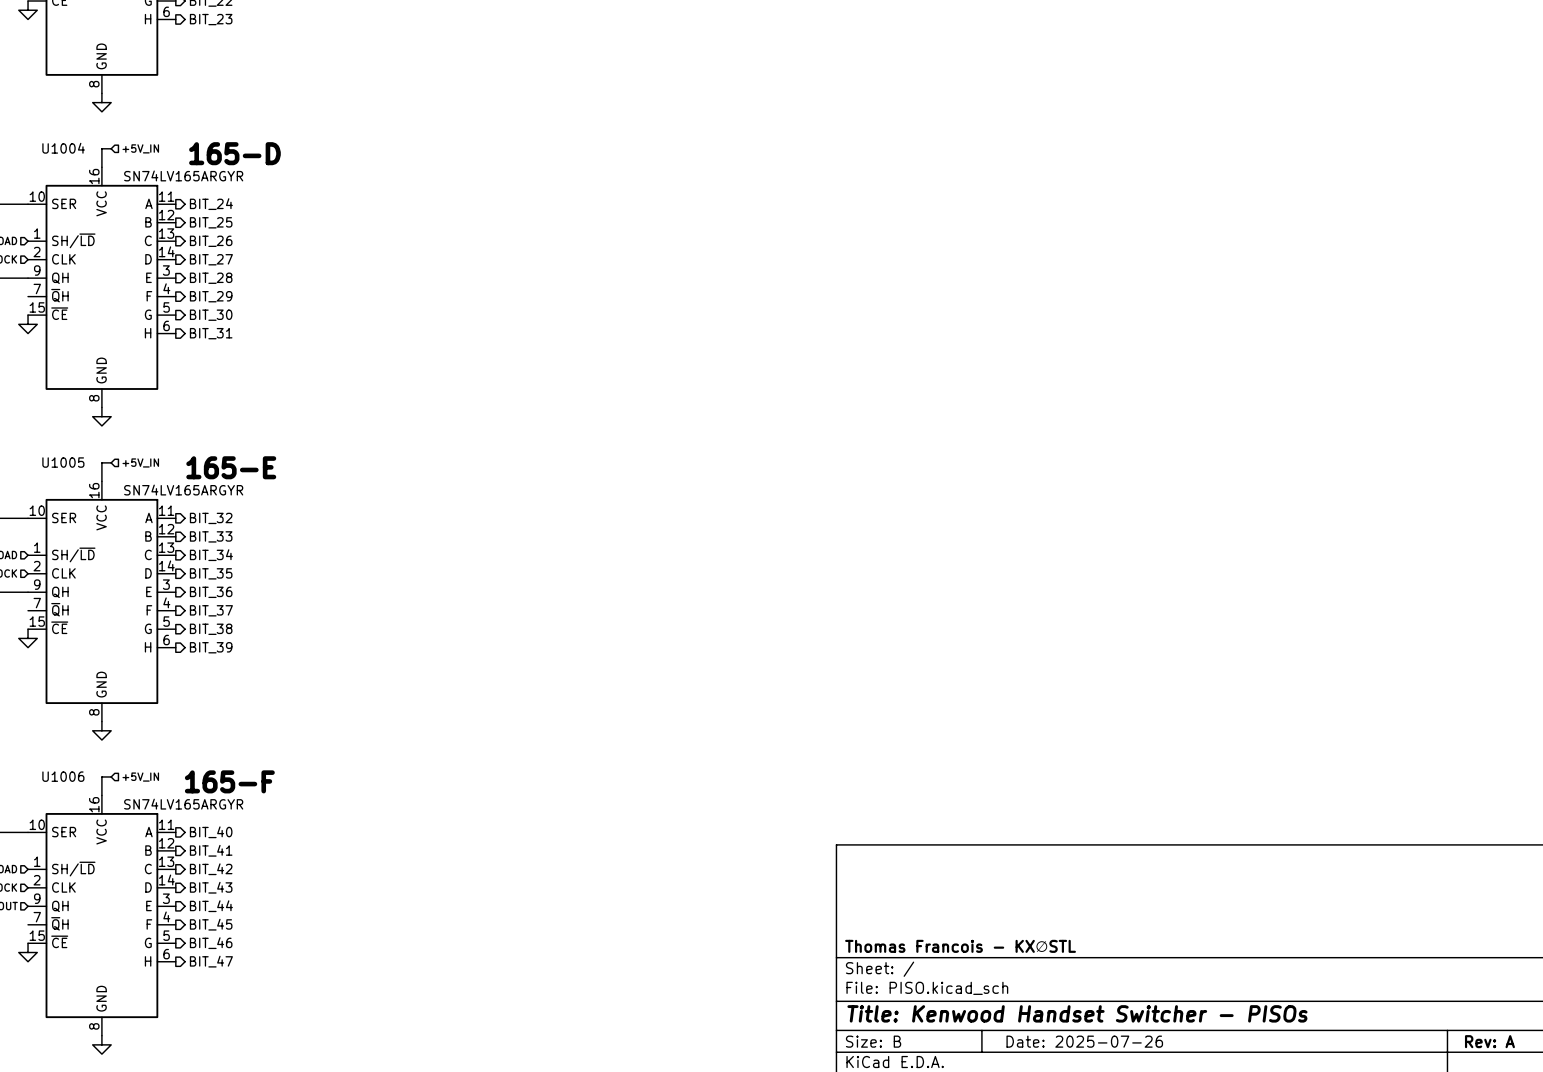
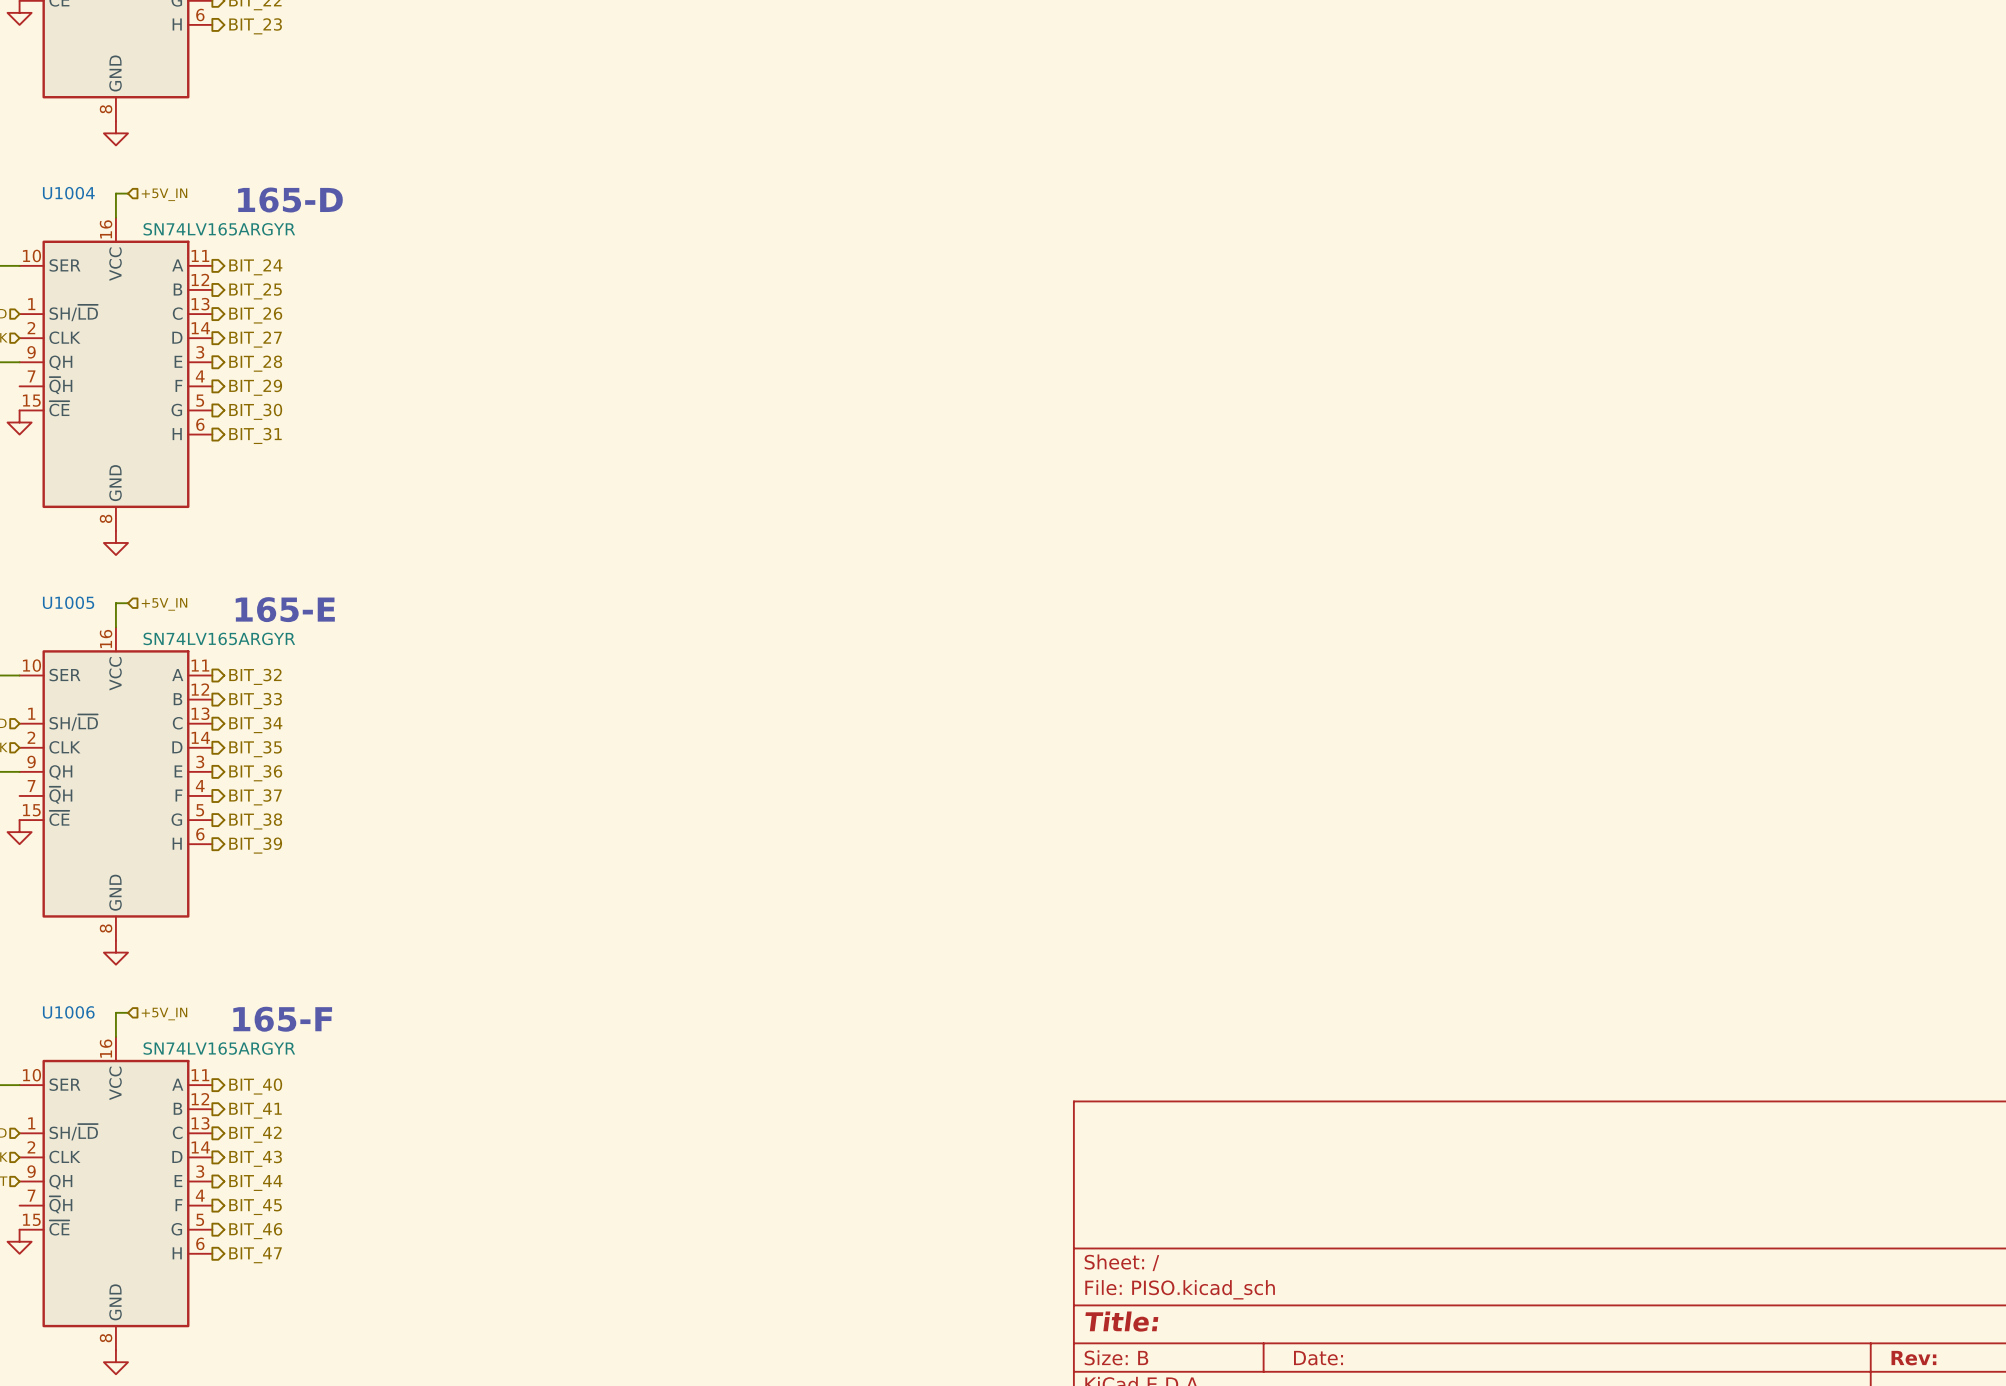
title block: Thomas Francois - KX∅STL (960, 946) -> none
title block: Title: Kenwood Handset Switcher - PISOs (1077, 1013) -> Title: (1121, 1321)
title block: Date: 2025-07-26 (1084, 1041) -> Date: (1318, 1358)
title block: Rev: A (1489, 1041) -> Rev: (1913, 1358)

